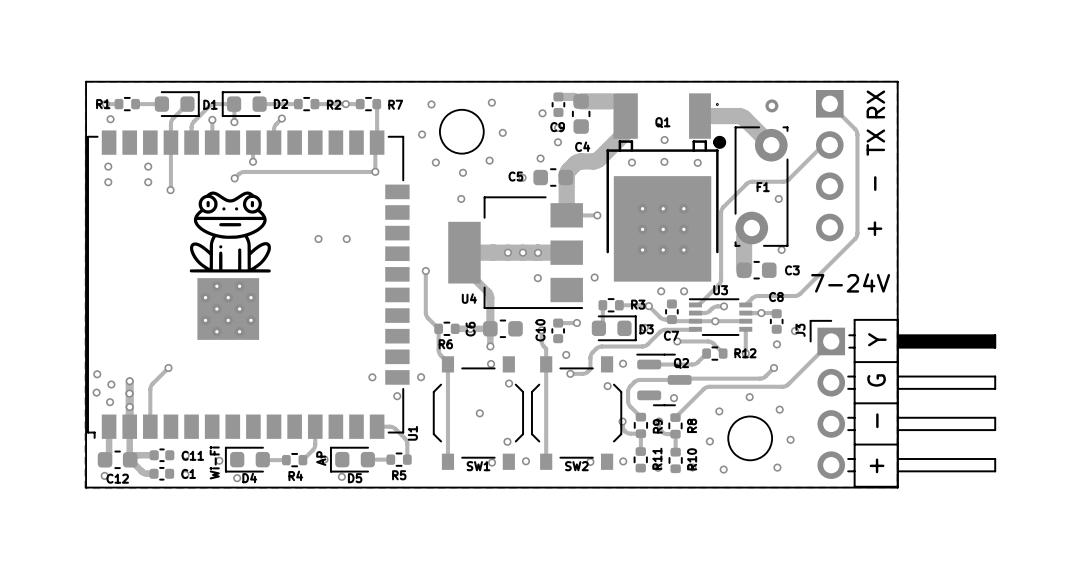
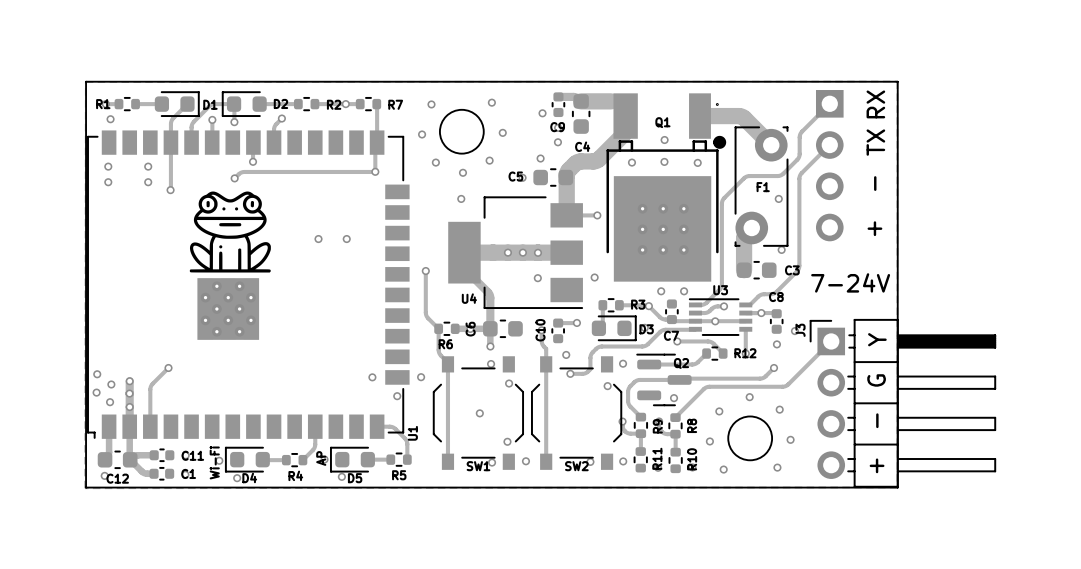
track: (829, 103) (857, 133) (856, 236) (798, 294) (757, 296) (745, 304) -> none
via: (771, 105) -> none
track: (829, 145) (821, 146) (786, 180) (749, 182) (722, 207) (721, 212) (720, 280) (698, 304) -> (829, 103) (800, 133) (799, 157) (783, 173) (778, 175) (746, 176) (723, 199) (721, 285) (705, 303) (698, 304)
track: none -> (829, 145) (799, 176) (798, 269) (775, 292) (760, 294) (750, 304)

